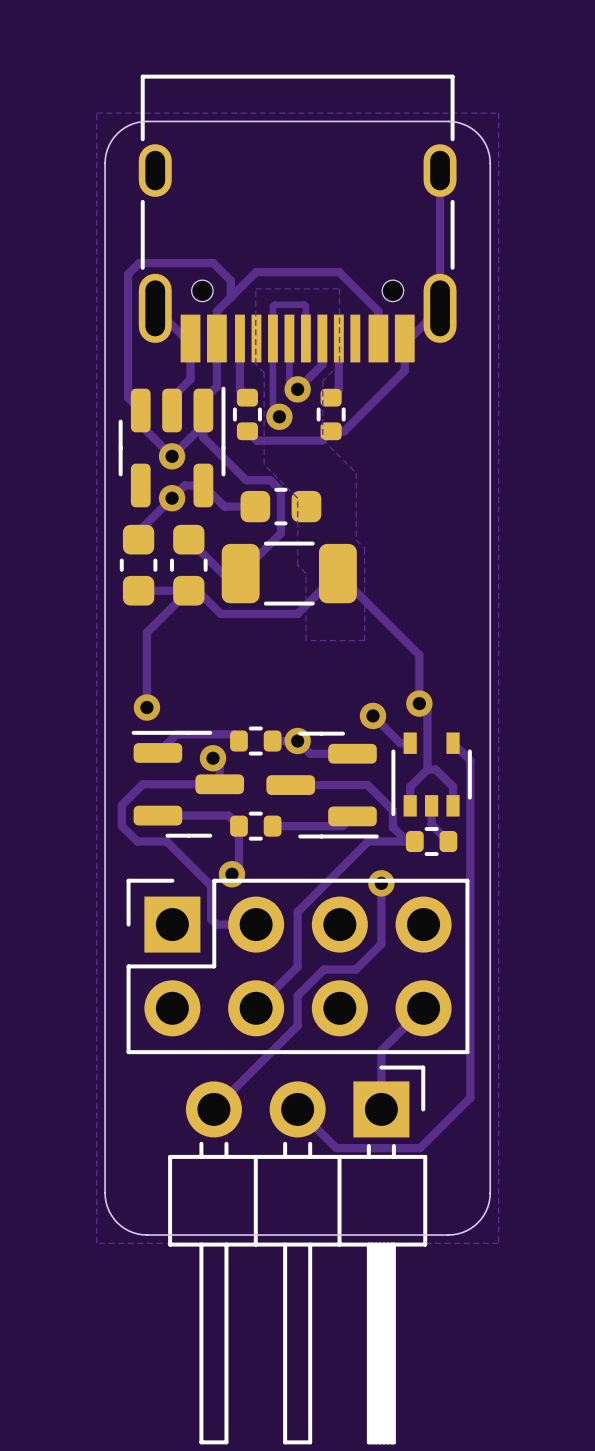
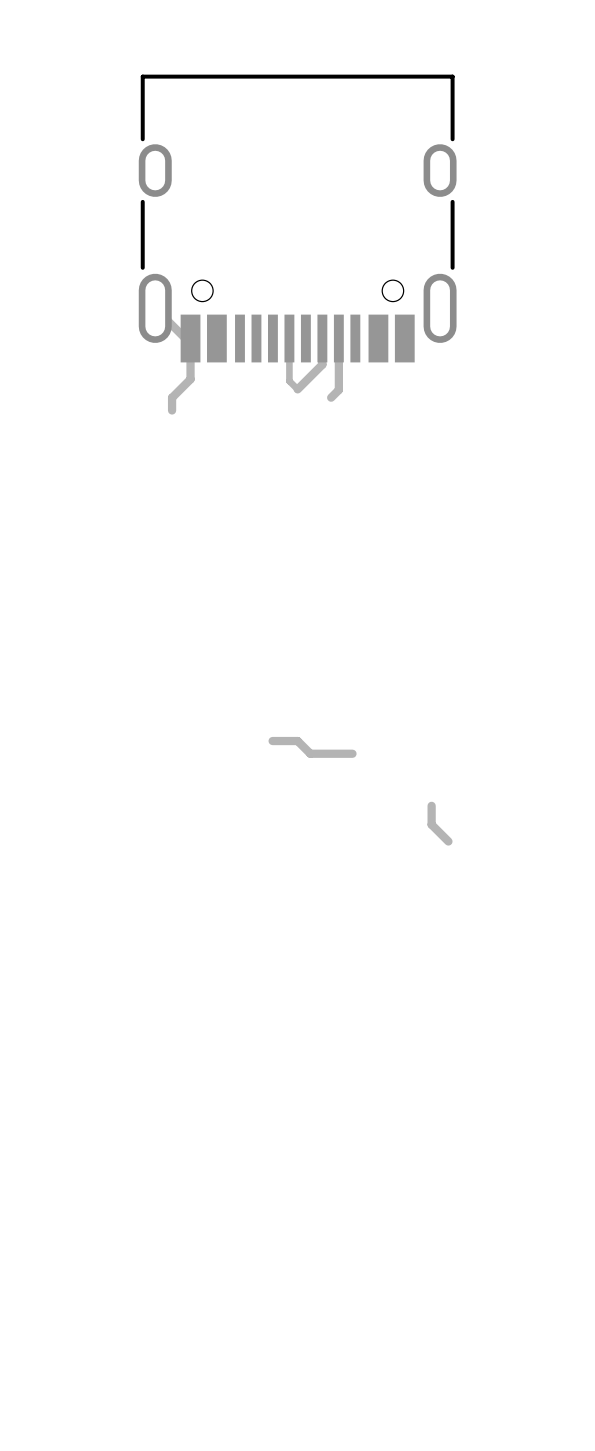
zone outline: (96, 113) (96, 1243) (498, 1243) (498, 113) (96, 113) -> none
board edge: (146, 121) (453, 121) (462, 123) (474, 130) (483, 141) (489, 154) (490, 1193) (487, 1206) (481, 1219) (470, 1228) (457, 1233) (142, 1234) (133, 1232) (120, 1225) (111, 1215) (106, 1202) (105, 163) (109, 145) (117, 133) (133, 123) (146, 121) -> none
track: (440, 170) (440, 308) (409, 338) (404, 338) (404, 370) (344, 431) (331, 431) (321, 440) (256, 440) (247, 431) -> none
zone outline: (255, 288) (255, 364) (264, 372) (264, 464) (297, 498) (297, 565) (306, 573) (306, 640) (364, 640) (364, 548) (356, 540) (356, 473) (322, 439) (322, 381) (339, 364) (339, 288) (255, 288) -> none
track: (230, 297) (230, 280) (213, 263) (139, 263) (128, 274) (128, 397) (140, 410) (140, 425) (172, 456) (203, 425) -> none
track: (239, 338) (239, 390) (247, 397) -> none
track: (305, 338) (305, 306) (304, 304) (274, 304) (272, 306) (272, 410) (279, 416) -> none
track: (378, 338) (378, 311) (339, 272) (256, 272) (216, 311) (216, 386) (203, 399) (203, 437) (246, 480) (270, 480) (280, 490) (280, 533) (240, 573) (222, 573) (188, 539) -> none
via: (297, 389) -> none
part: (247, 414) -> none
part: (331, 414) -> none
via: (279, 416) -> none
part: (172, 446) -> none
via: (172, 456) -> none
via: (172, 498) -> none
track: (255, 506) (224, 506) (203, 485) (184, 485) (138, 531) (138, 539) -> none
part: (280, 506) -> none
part: (138, 565) -> none
part: (188, 565) -> none
part: (289, 573) -> none
track: (138, 590) (197, 590) (220, 613) (297, 613) (337, 573) (419, 655) (419, 703) (427, 711) (427, 769) -> none
track: (188, 590) (146, 632) (146, 707) -> none
via: (419, 703) -> none
via: (146, 707) -> none
track: (373, 715) (400, 743) (410, 743) -> none
via: (373, 715) -> none
track: (238, 741) (232, 734) (176, 734) (157, 752) -> none
part: (255, 741) -> none
via: (297, 741) -> none
track: (453, 743) (470, 760) (470, 1097) (420, 1148) (336, 1148) (297, 1109) -> none
track: (213, 758) (219, 764) (219, 784) (142, 784) (121, 805) (121, 825) (137, 841) (166, 841) (211, 885) (211, 919) (216, 924) (256, 924) -> none
via: (213, 758) -> none
track: (427, 769) (435, 769) (453, 786) (453, 805) -> none
track: (427, 769) (410, 786) (410, 805) -> none
part: (431, 774) -> none
part: (187, 784) -> none
track: (290, 785) (367, 785) (392, 810) (392, 827) (407, 841) -> none
part: (322, 785) -> none
track: (157, 815) (228, 815) (238, 826) (238, 867) (232, 874) -> none
track: (352, 816) (342, 826) (272, 826) -> none
part: (255, 826) -> none
track: (414, 841) (368, 841) (297, 912) (297, 966) (256, 1008) -> none
part: (431, 841) -> none
via: (232, 874) -> none
track: (381, 883) (381, 944) (355, 969) (323, 969) (297, 995) (297, 1025) (213, 1109) -> none
via: (381, 883) -> none
part: (297, 966) -> none
track: (423, 1008) (381, 1050) (381, 1109) -> none
part: (297, 1254) -> none

